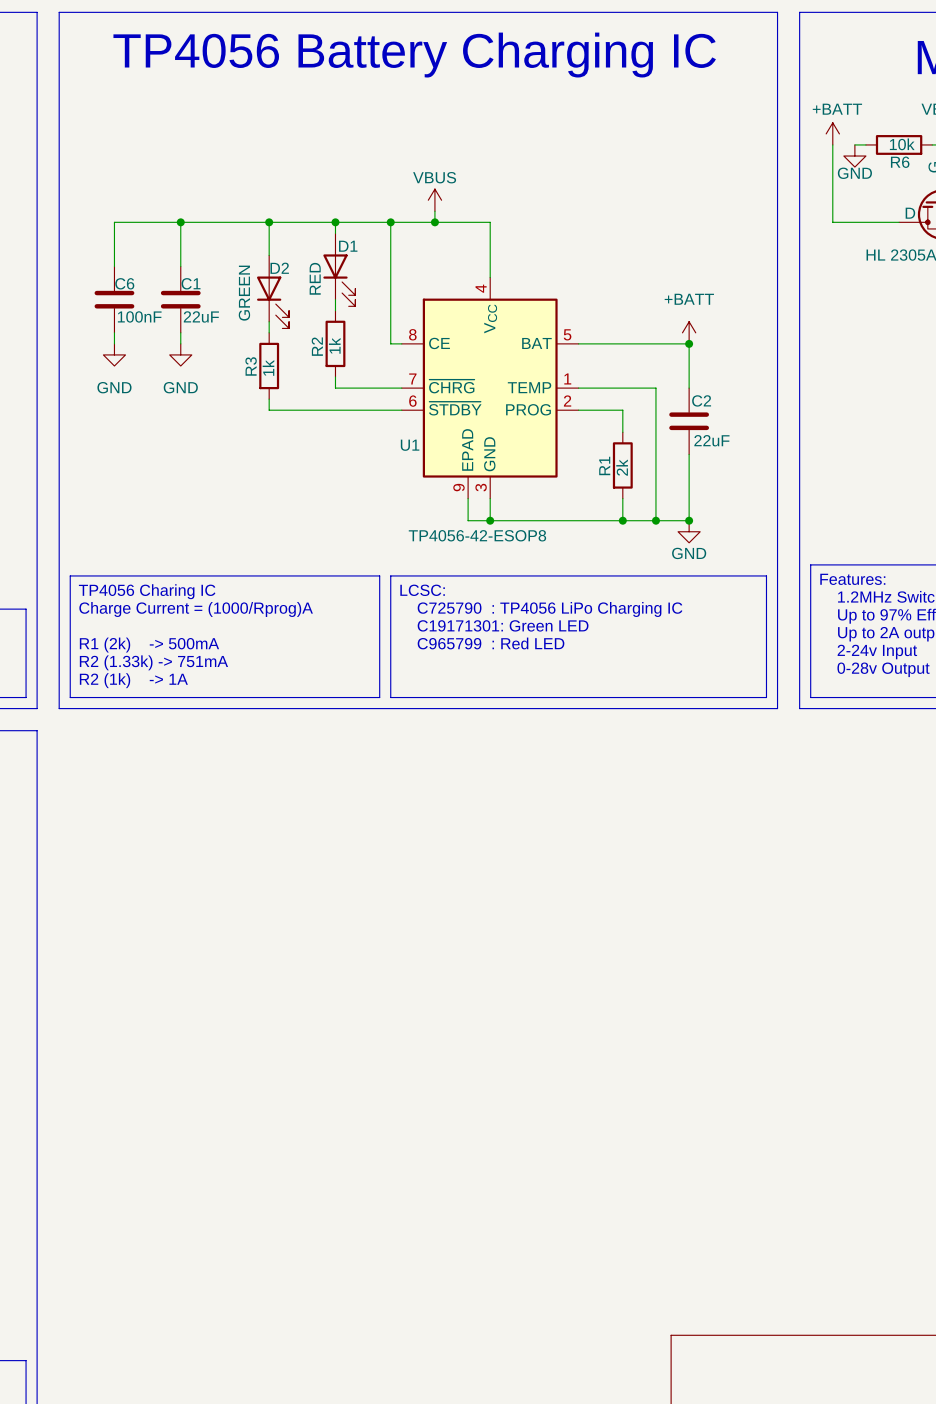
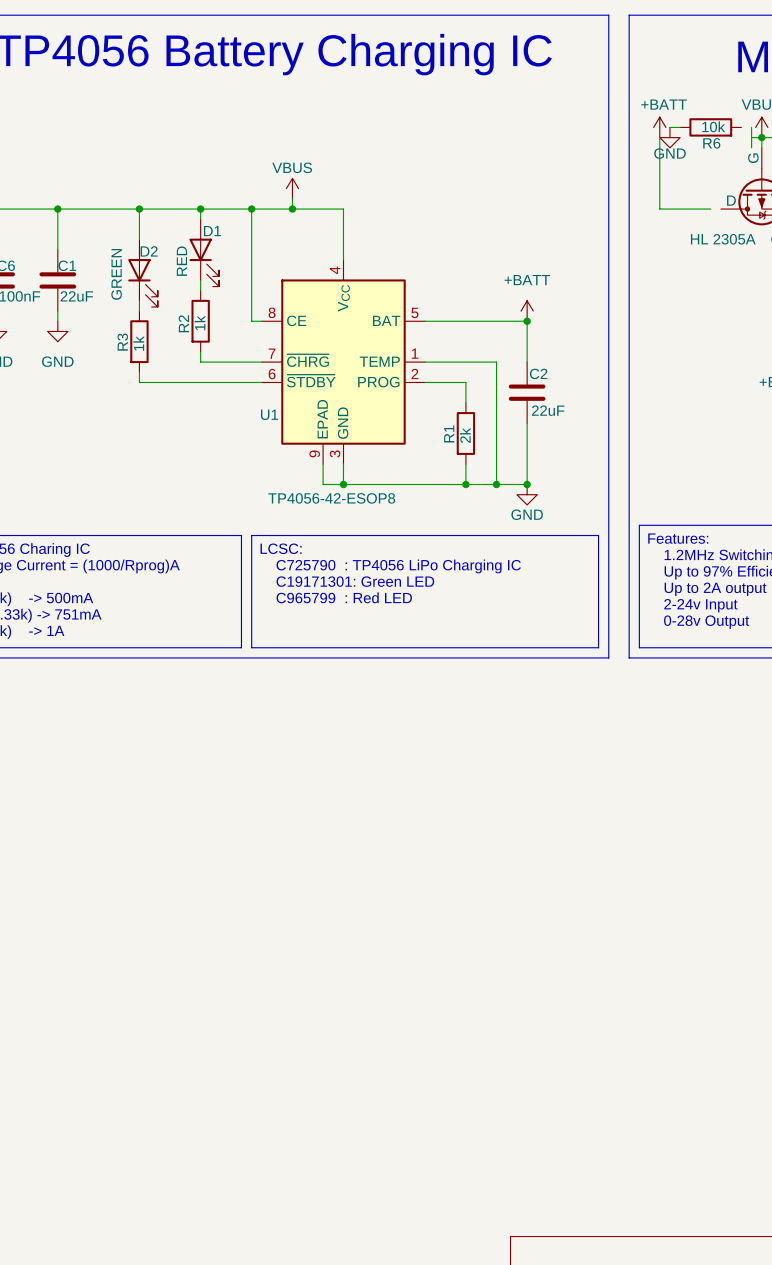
wire: none -> (751, 127) (751, 147)
wire: (854, 144) (865, 144) -> (669, 127) (680, 127)
R6 position: (899, 144) -> (710, 127)
power symbol position: GND (854, 156) -> GND (669, 137)
wire: (888, 222) (899, 222) -> none

